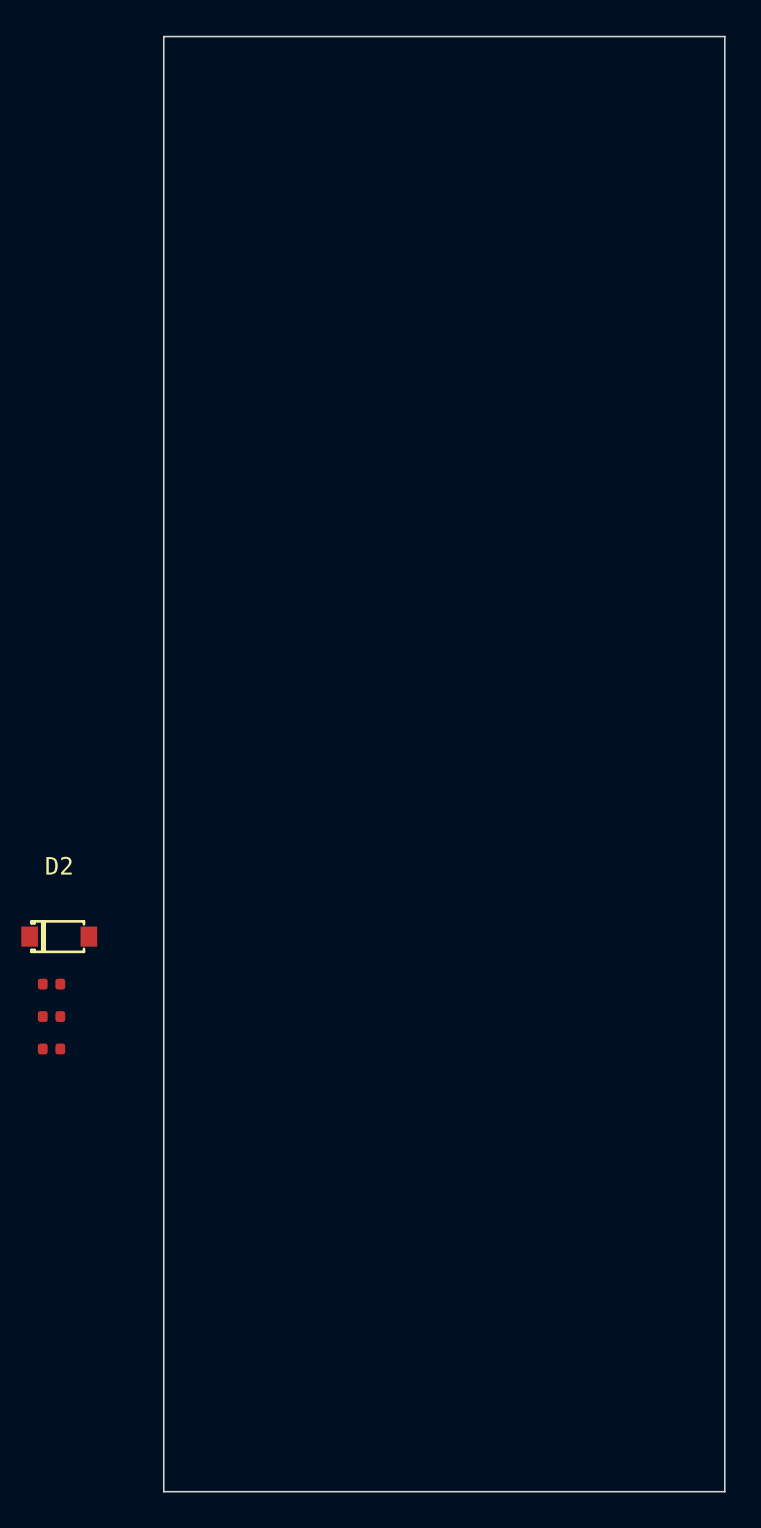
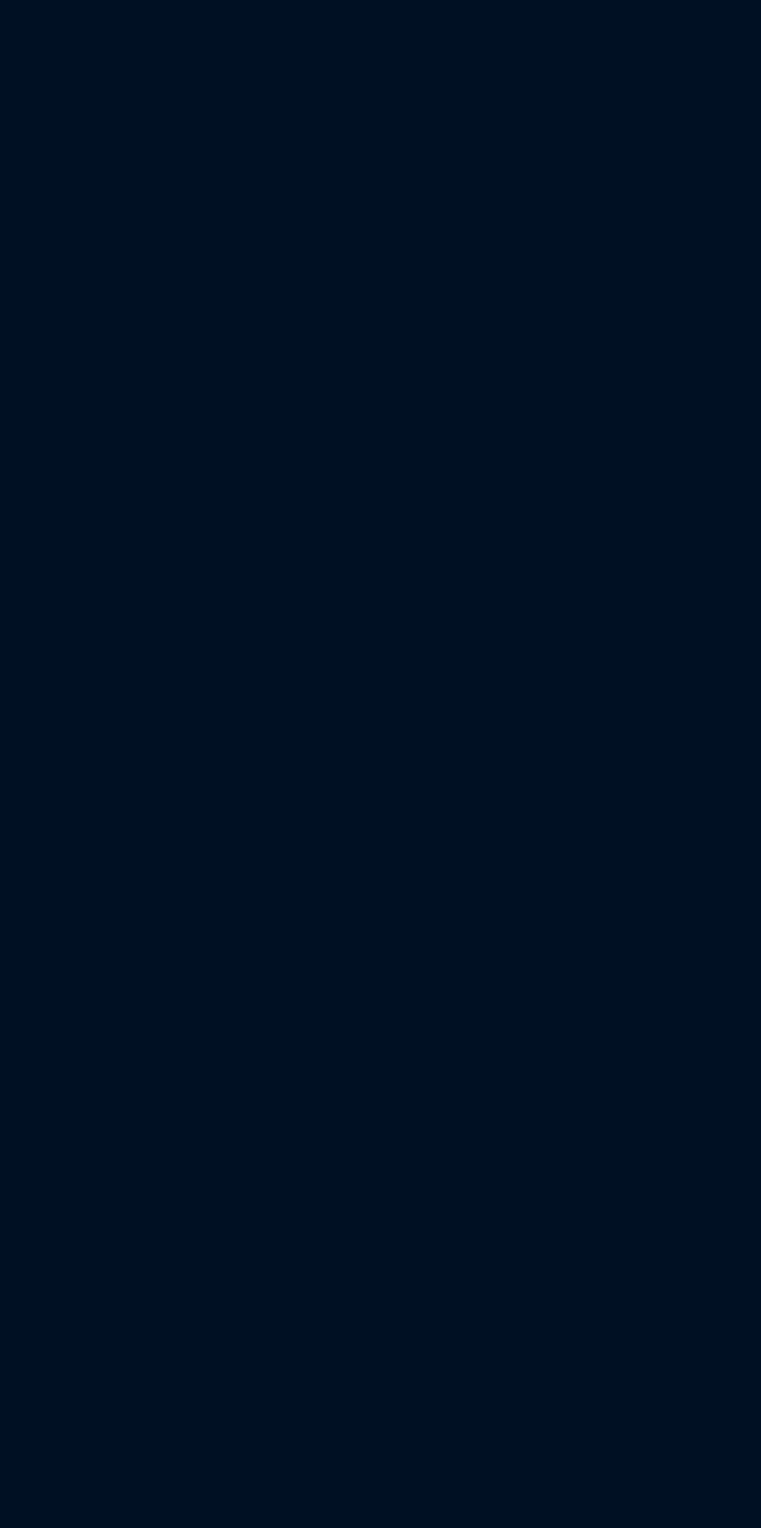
board edge: (163, 36) (724, 36) (724, 1491) (163, 1491) (163, 36) -> none
D2: (59, 936) -> none
part: (51, 984) -> none
part: (51, 1016) -> none
part: (51, 1048) -> none

